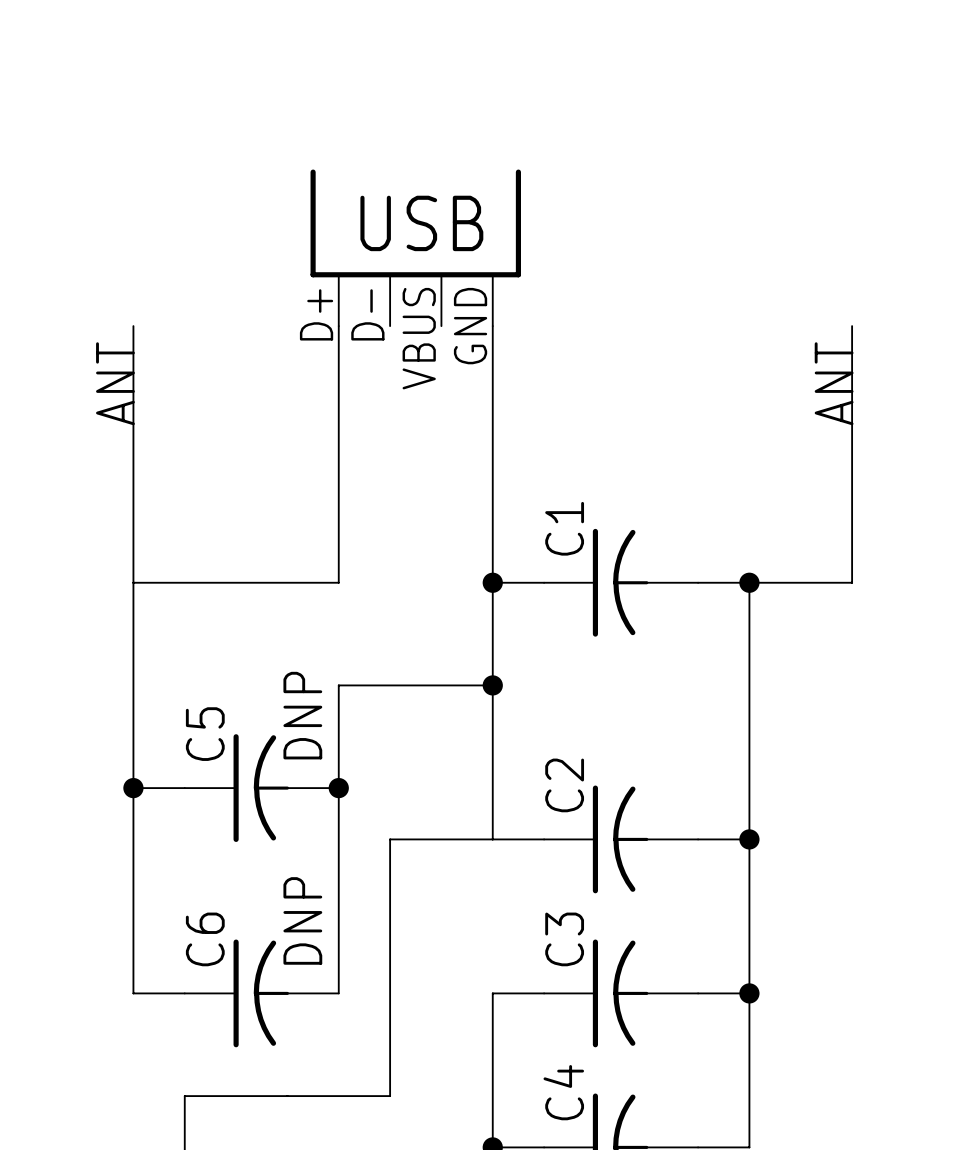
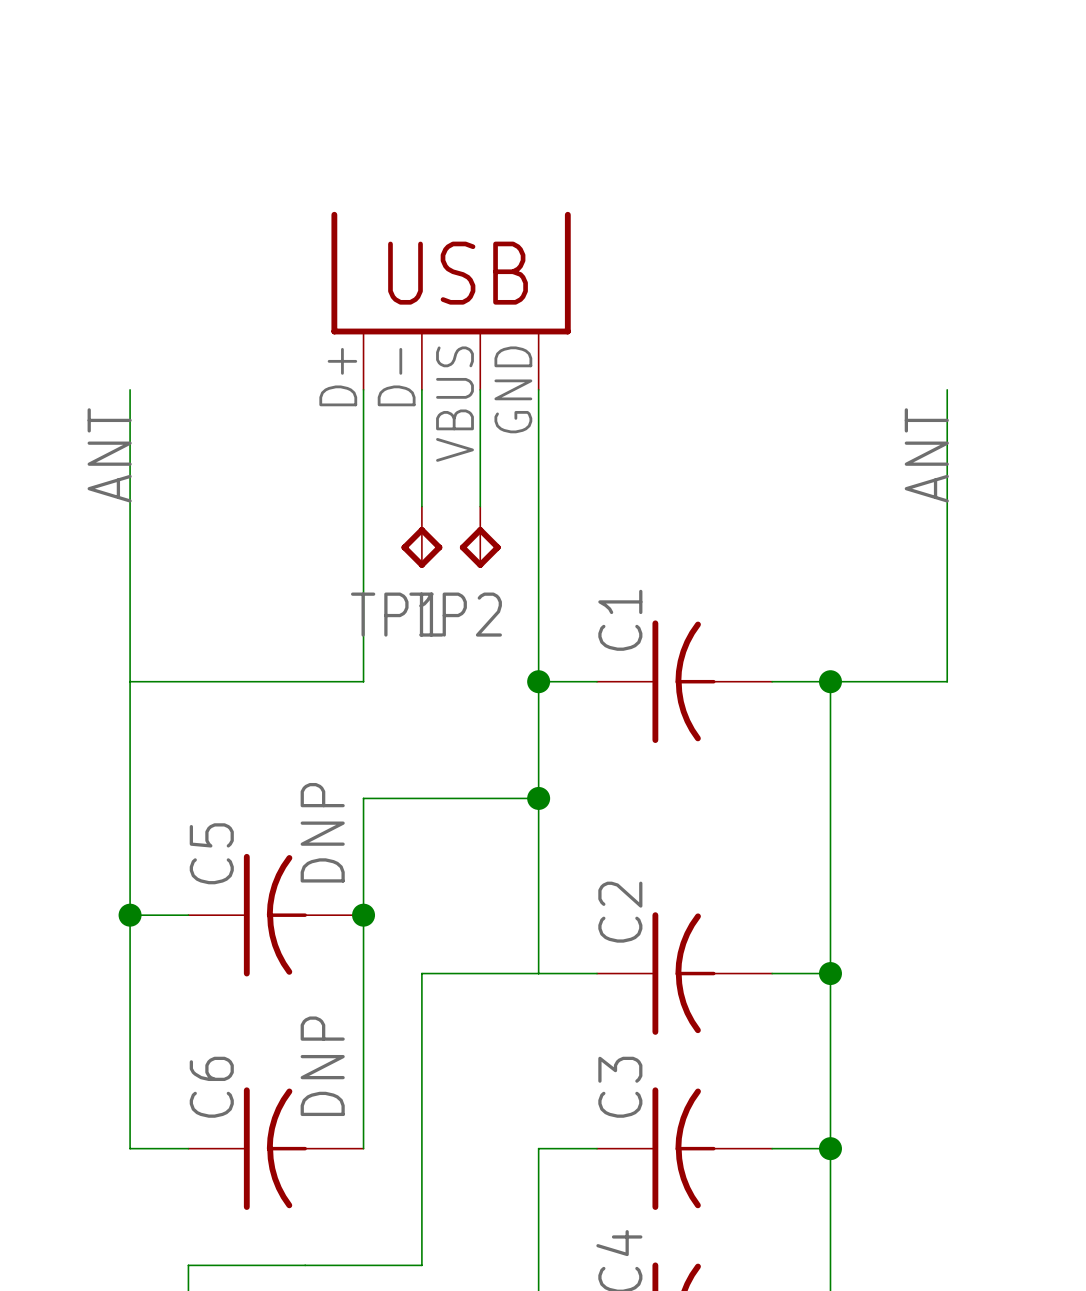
wire: none -> (421, 389) (421, 506)
wire: none -> (480, 389) (480, 506)
TP1: none -> (421, 537)
TP2: none -> (480, 537)

